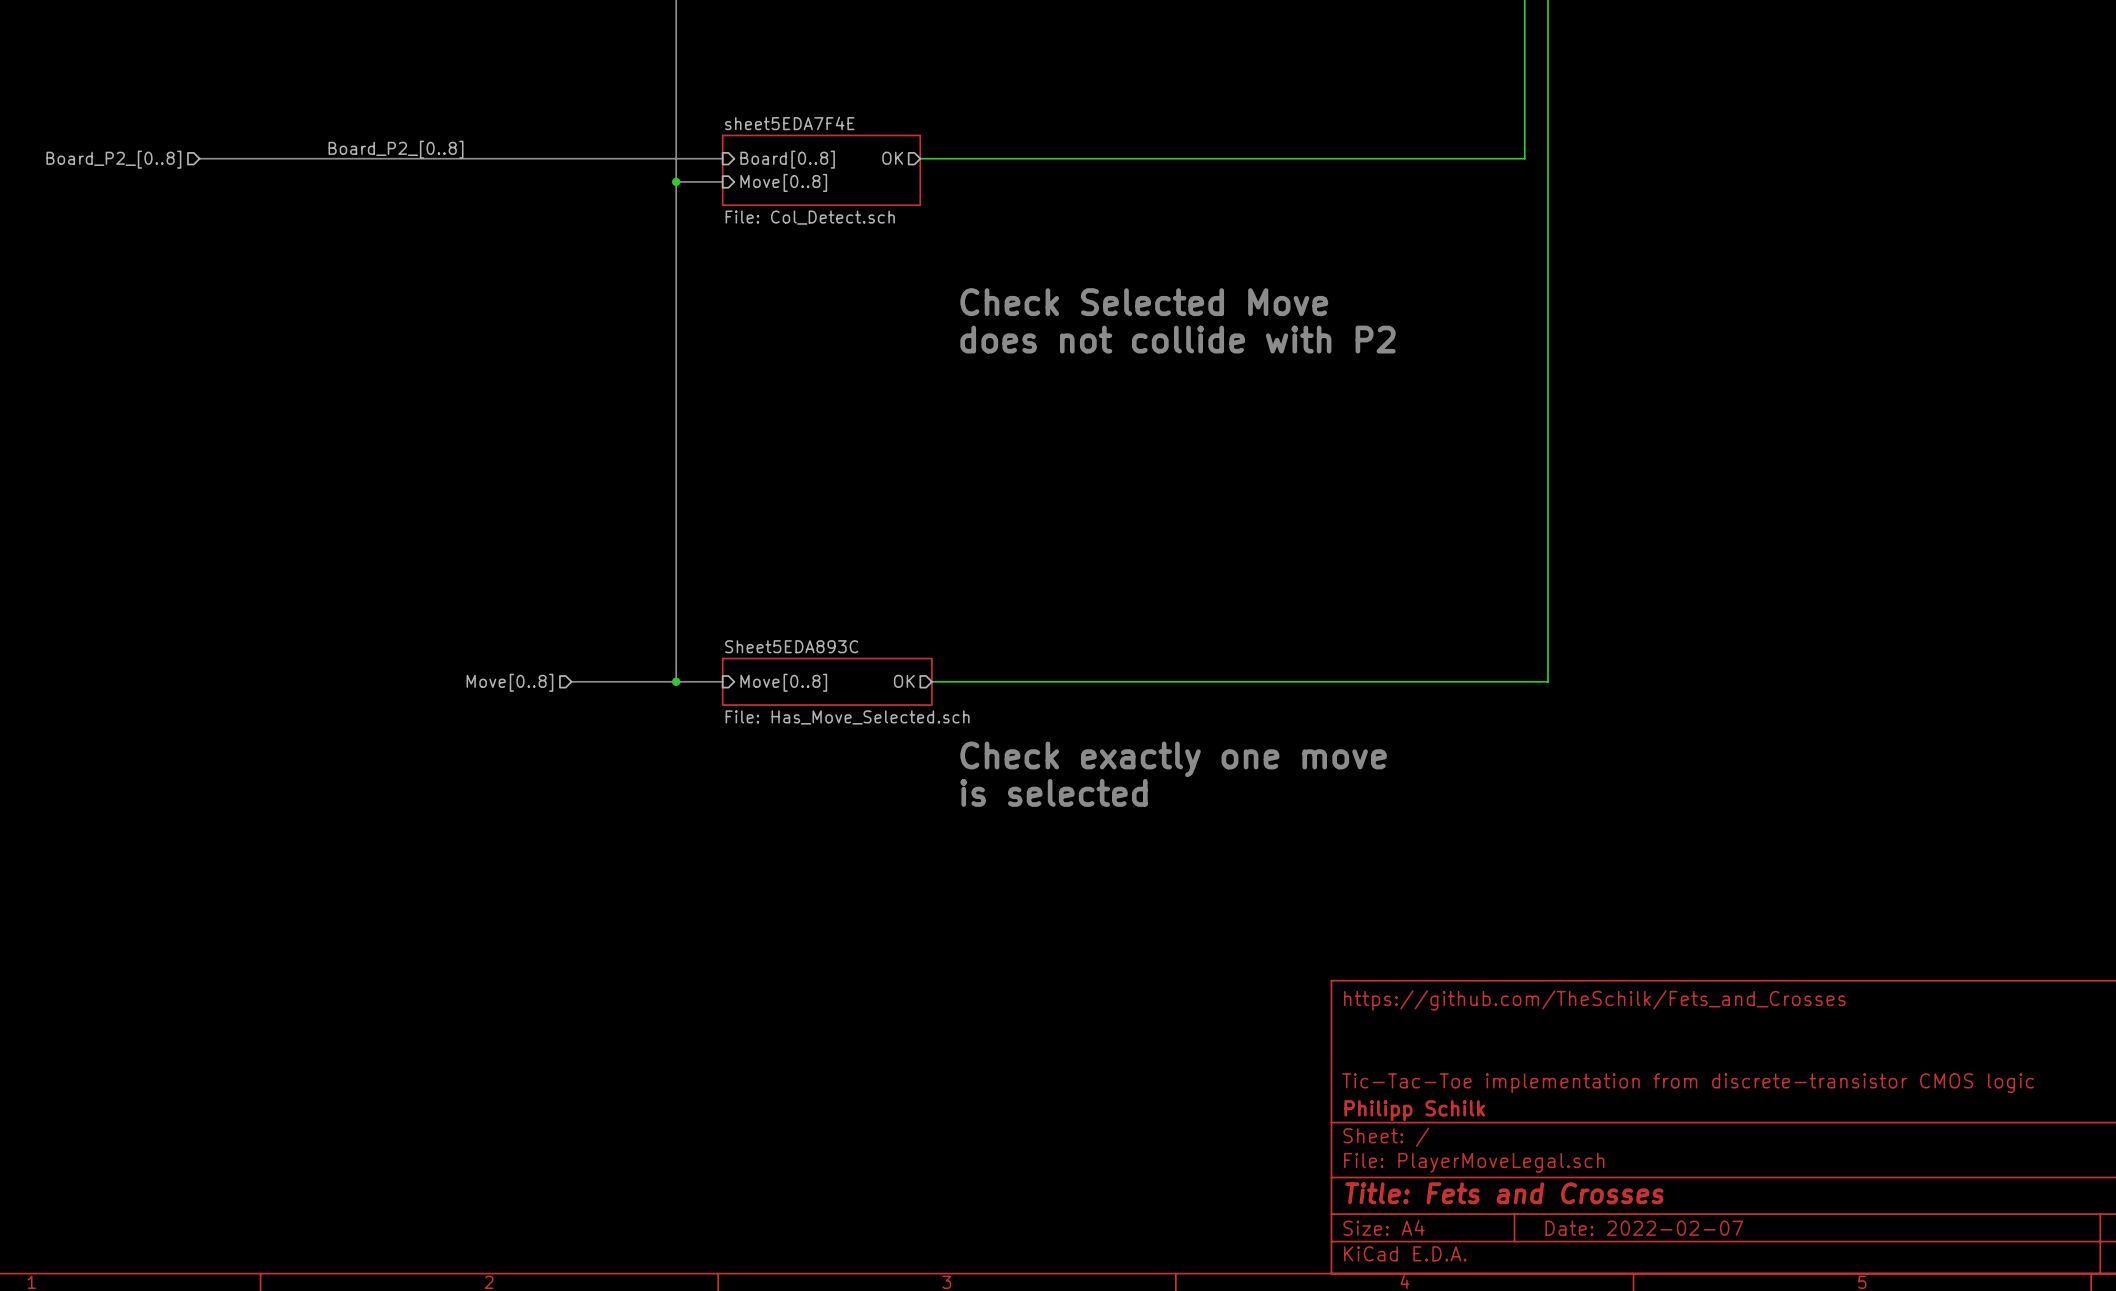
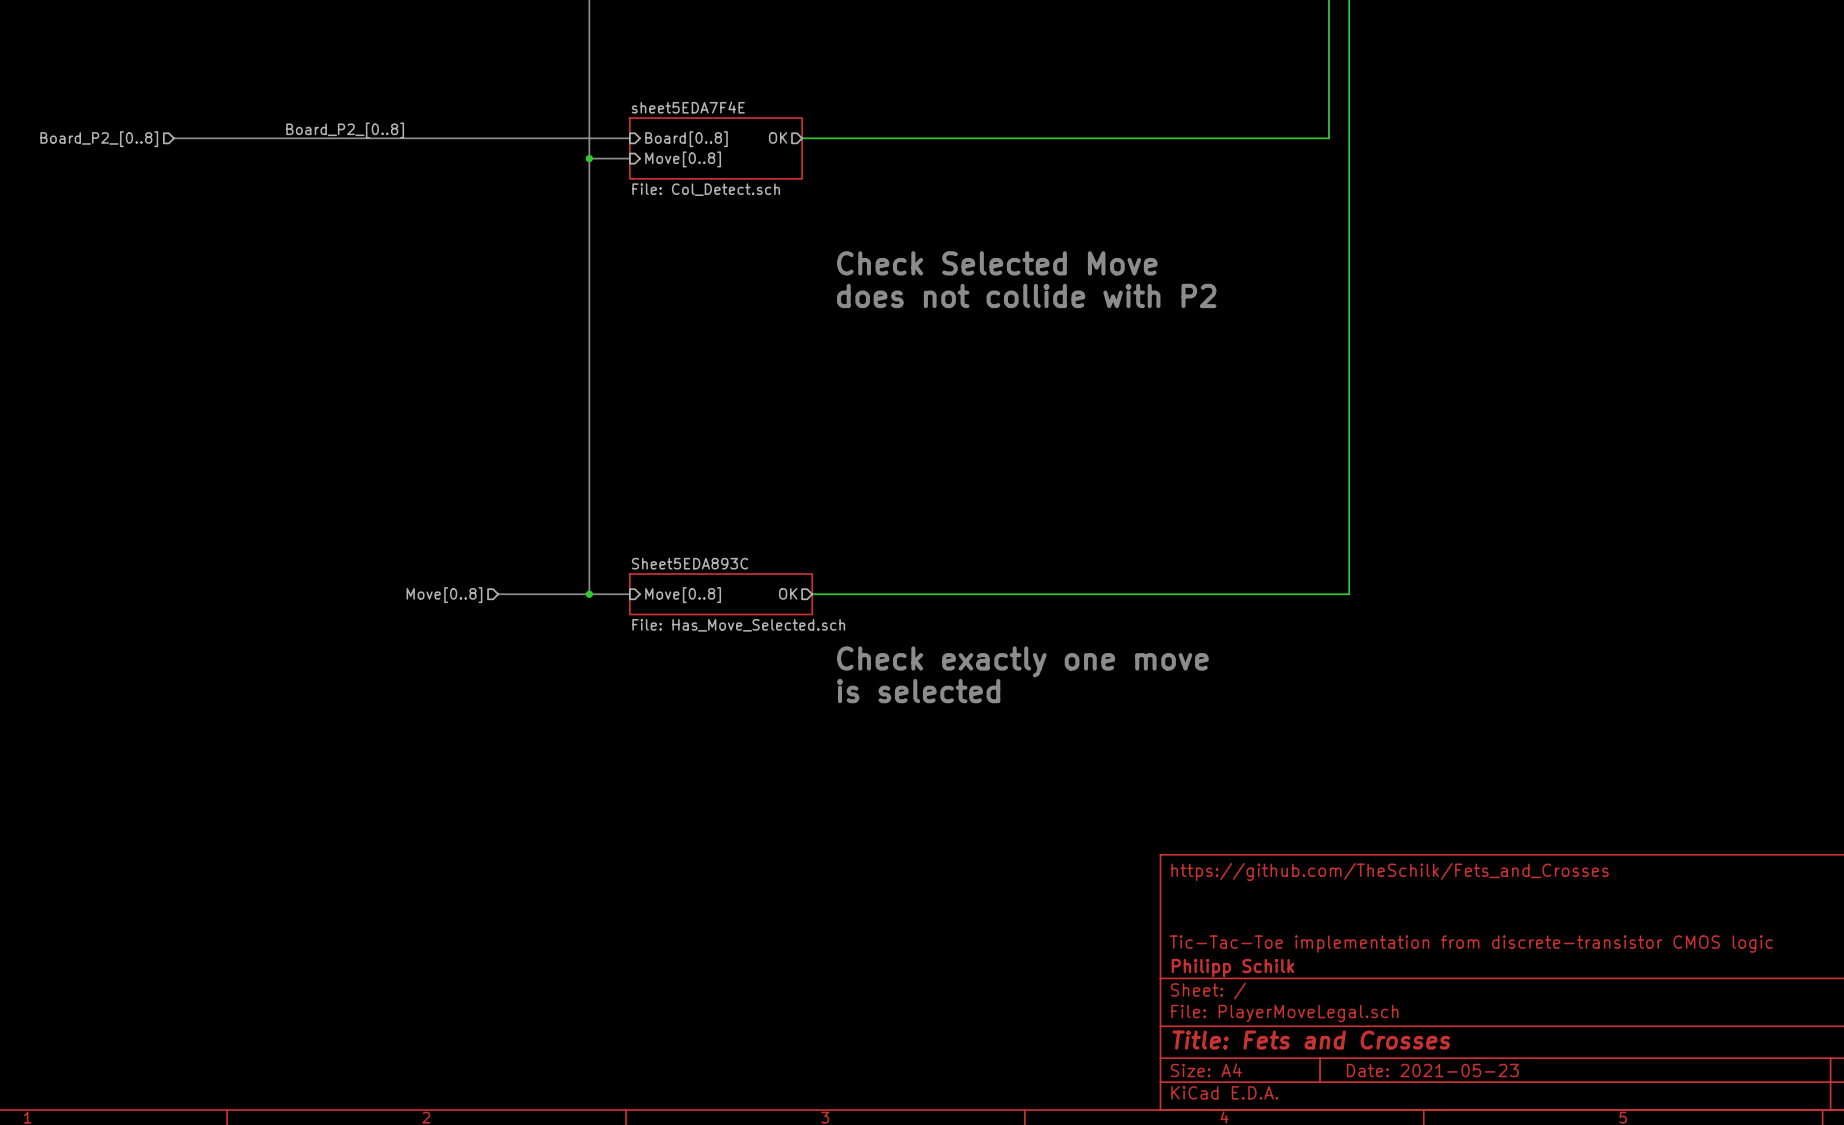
title block: Date: 2022-02-07 (1644, 1228) -> Date: 2021-05-23 (1432, 1070)

